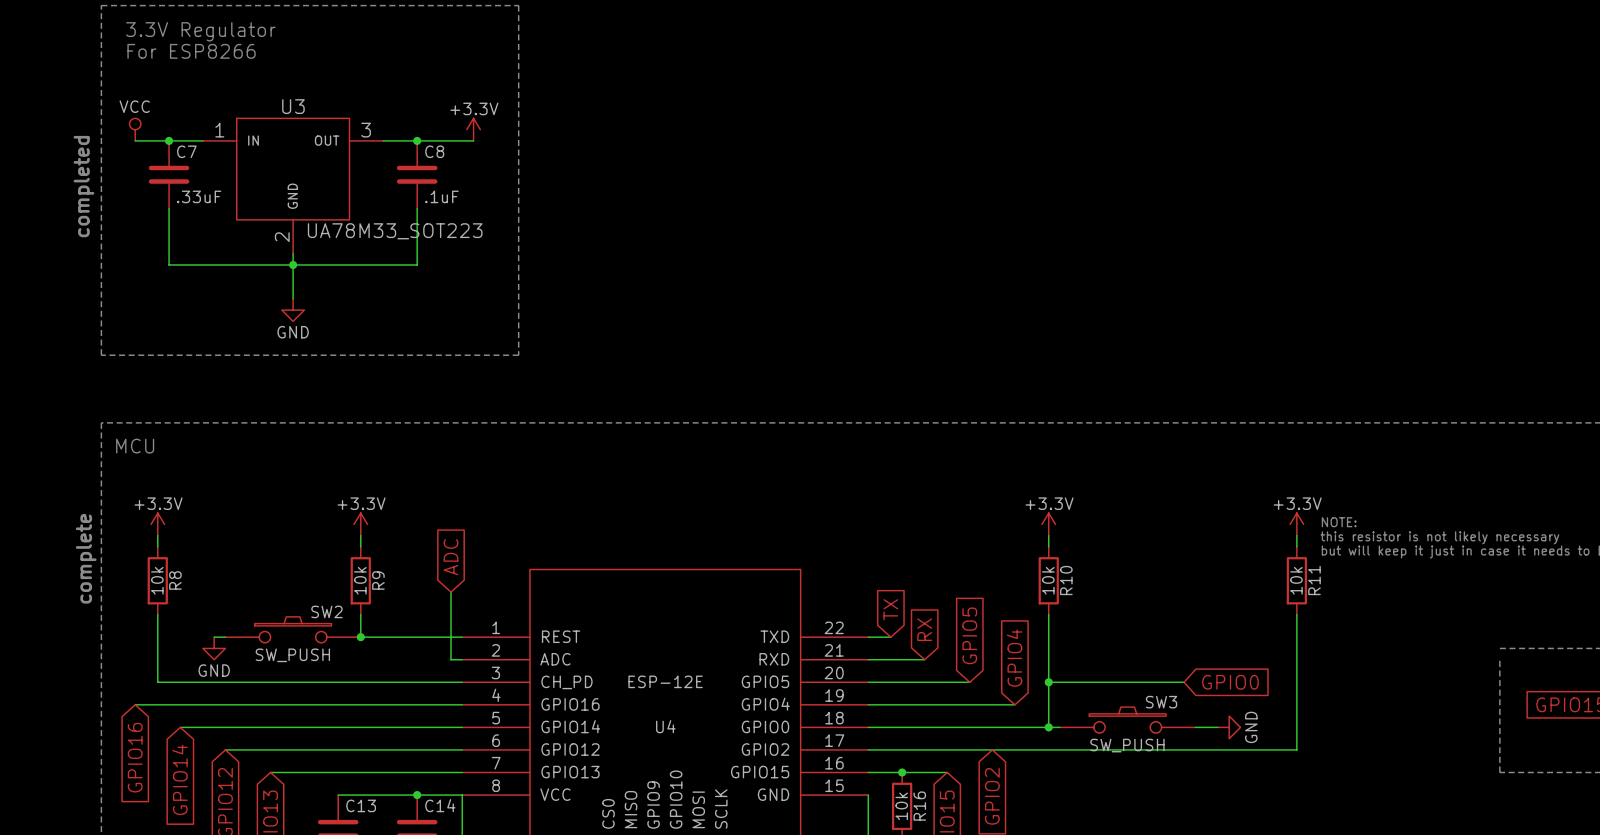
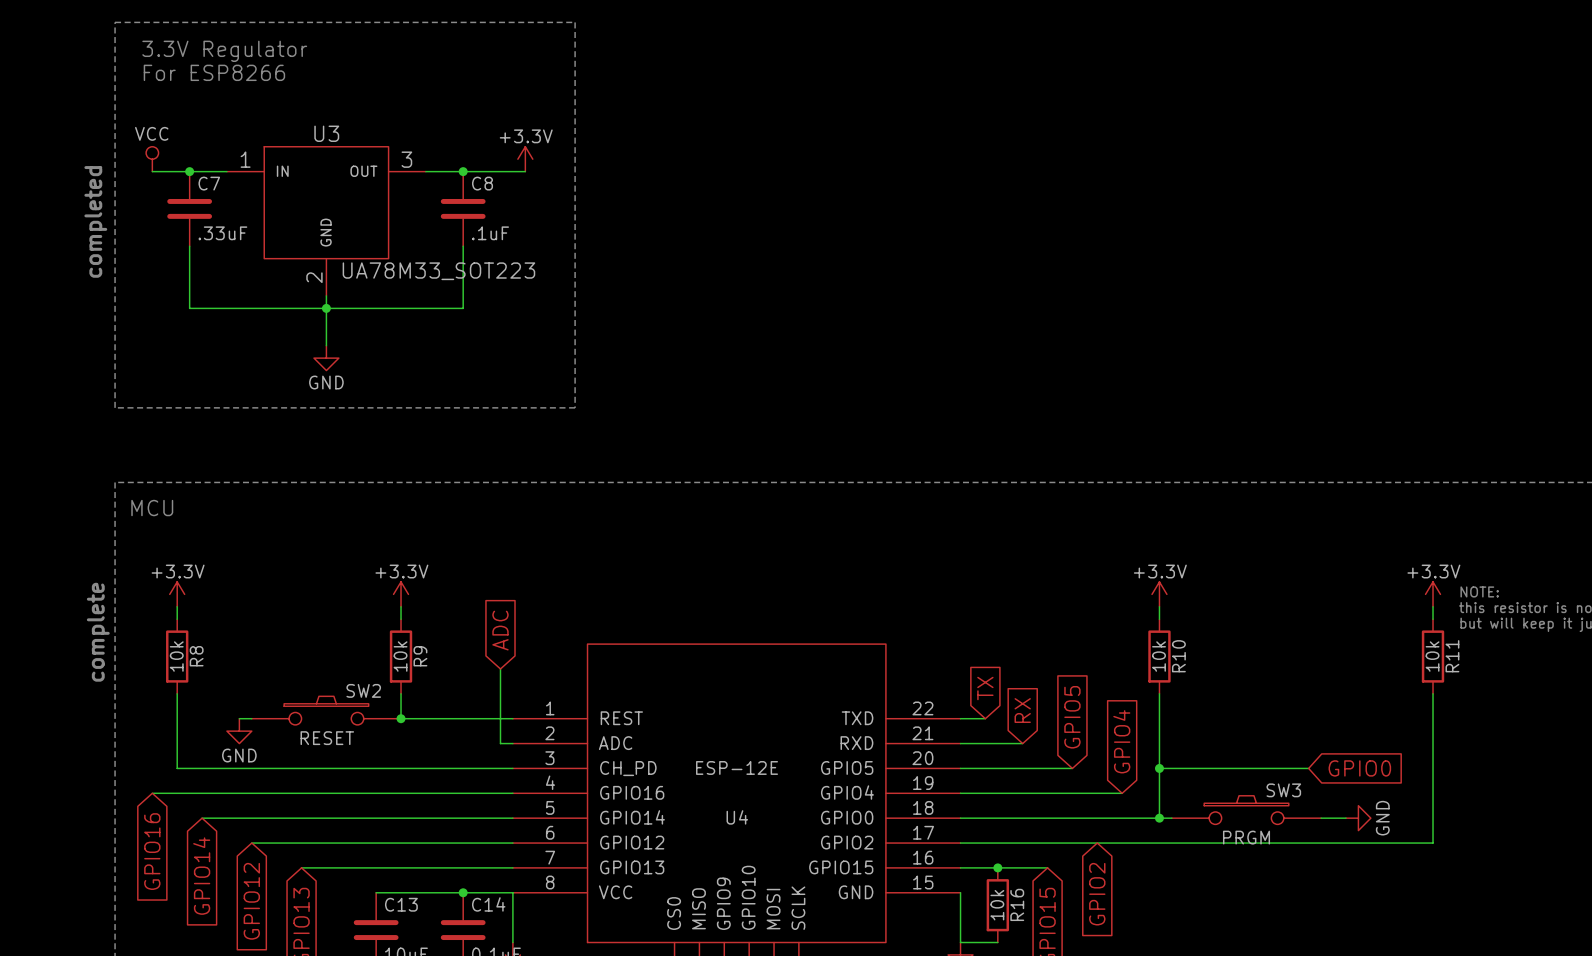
SW2 value: SW_PUSH (292, 655) -> RESET (327, 738)
SW3 value: SW_PUSH (1127, 745) -> PRGM (1246, 837)

